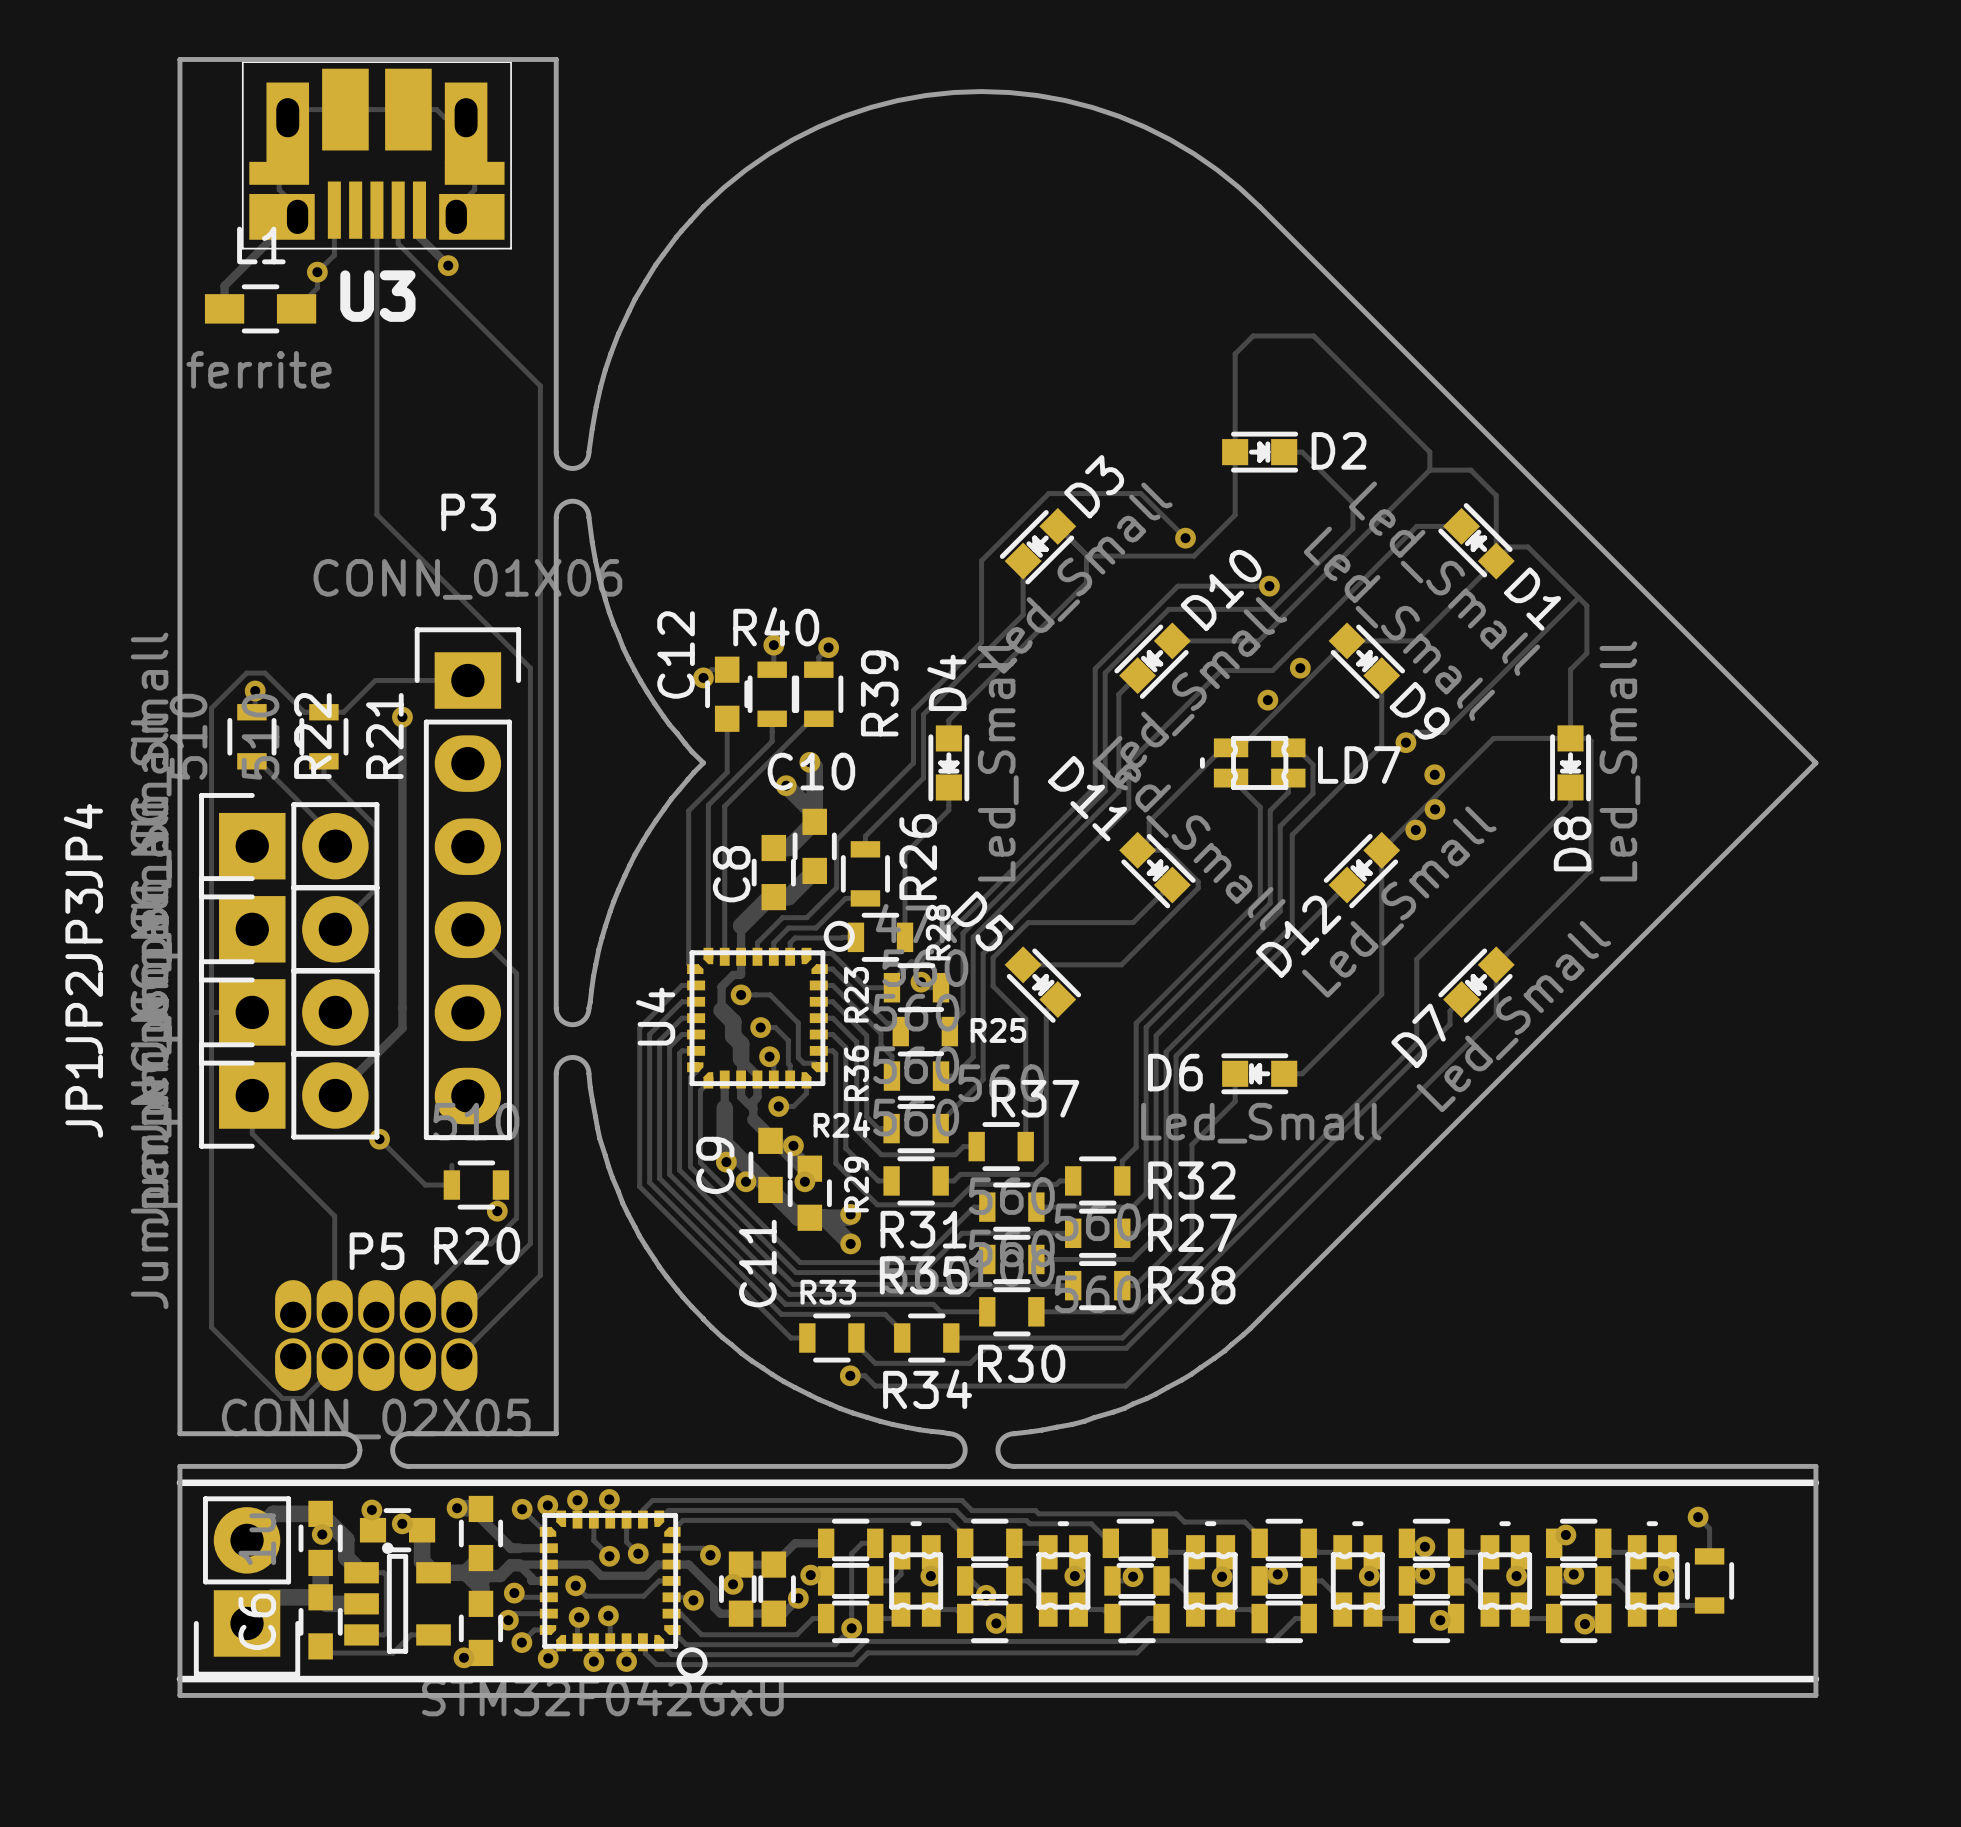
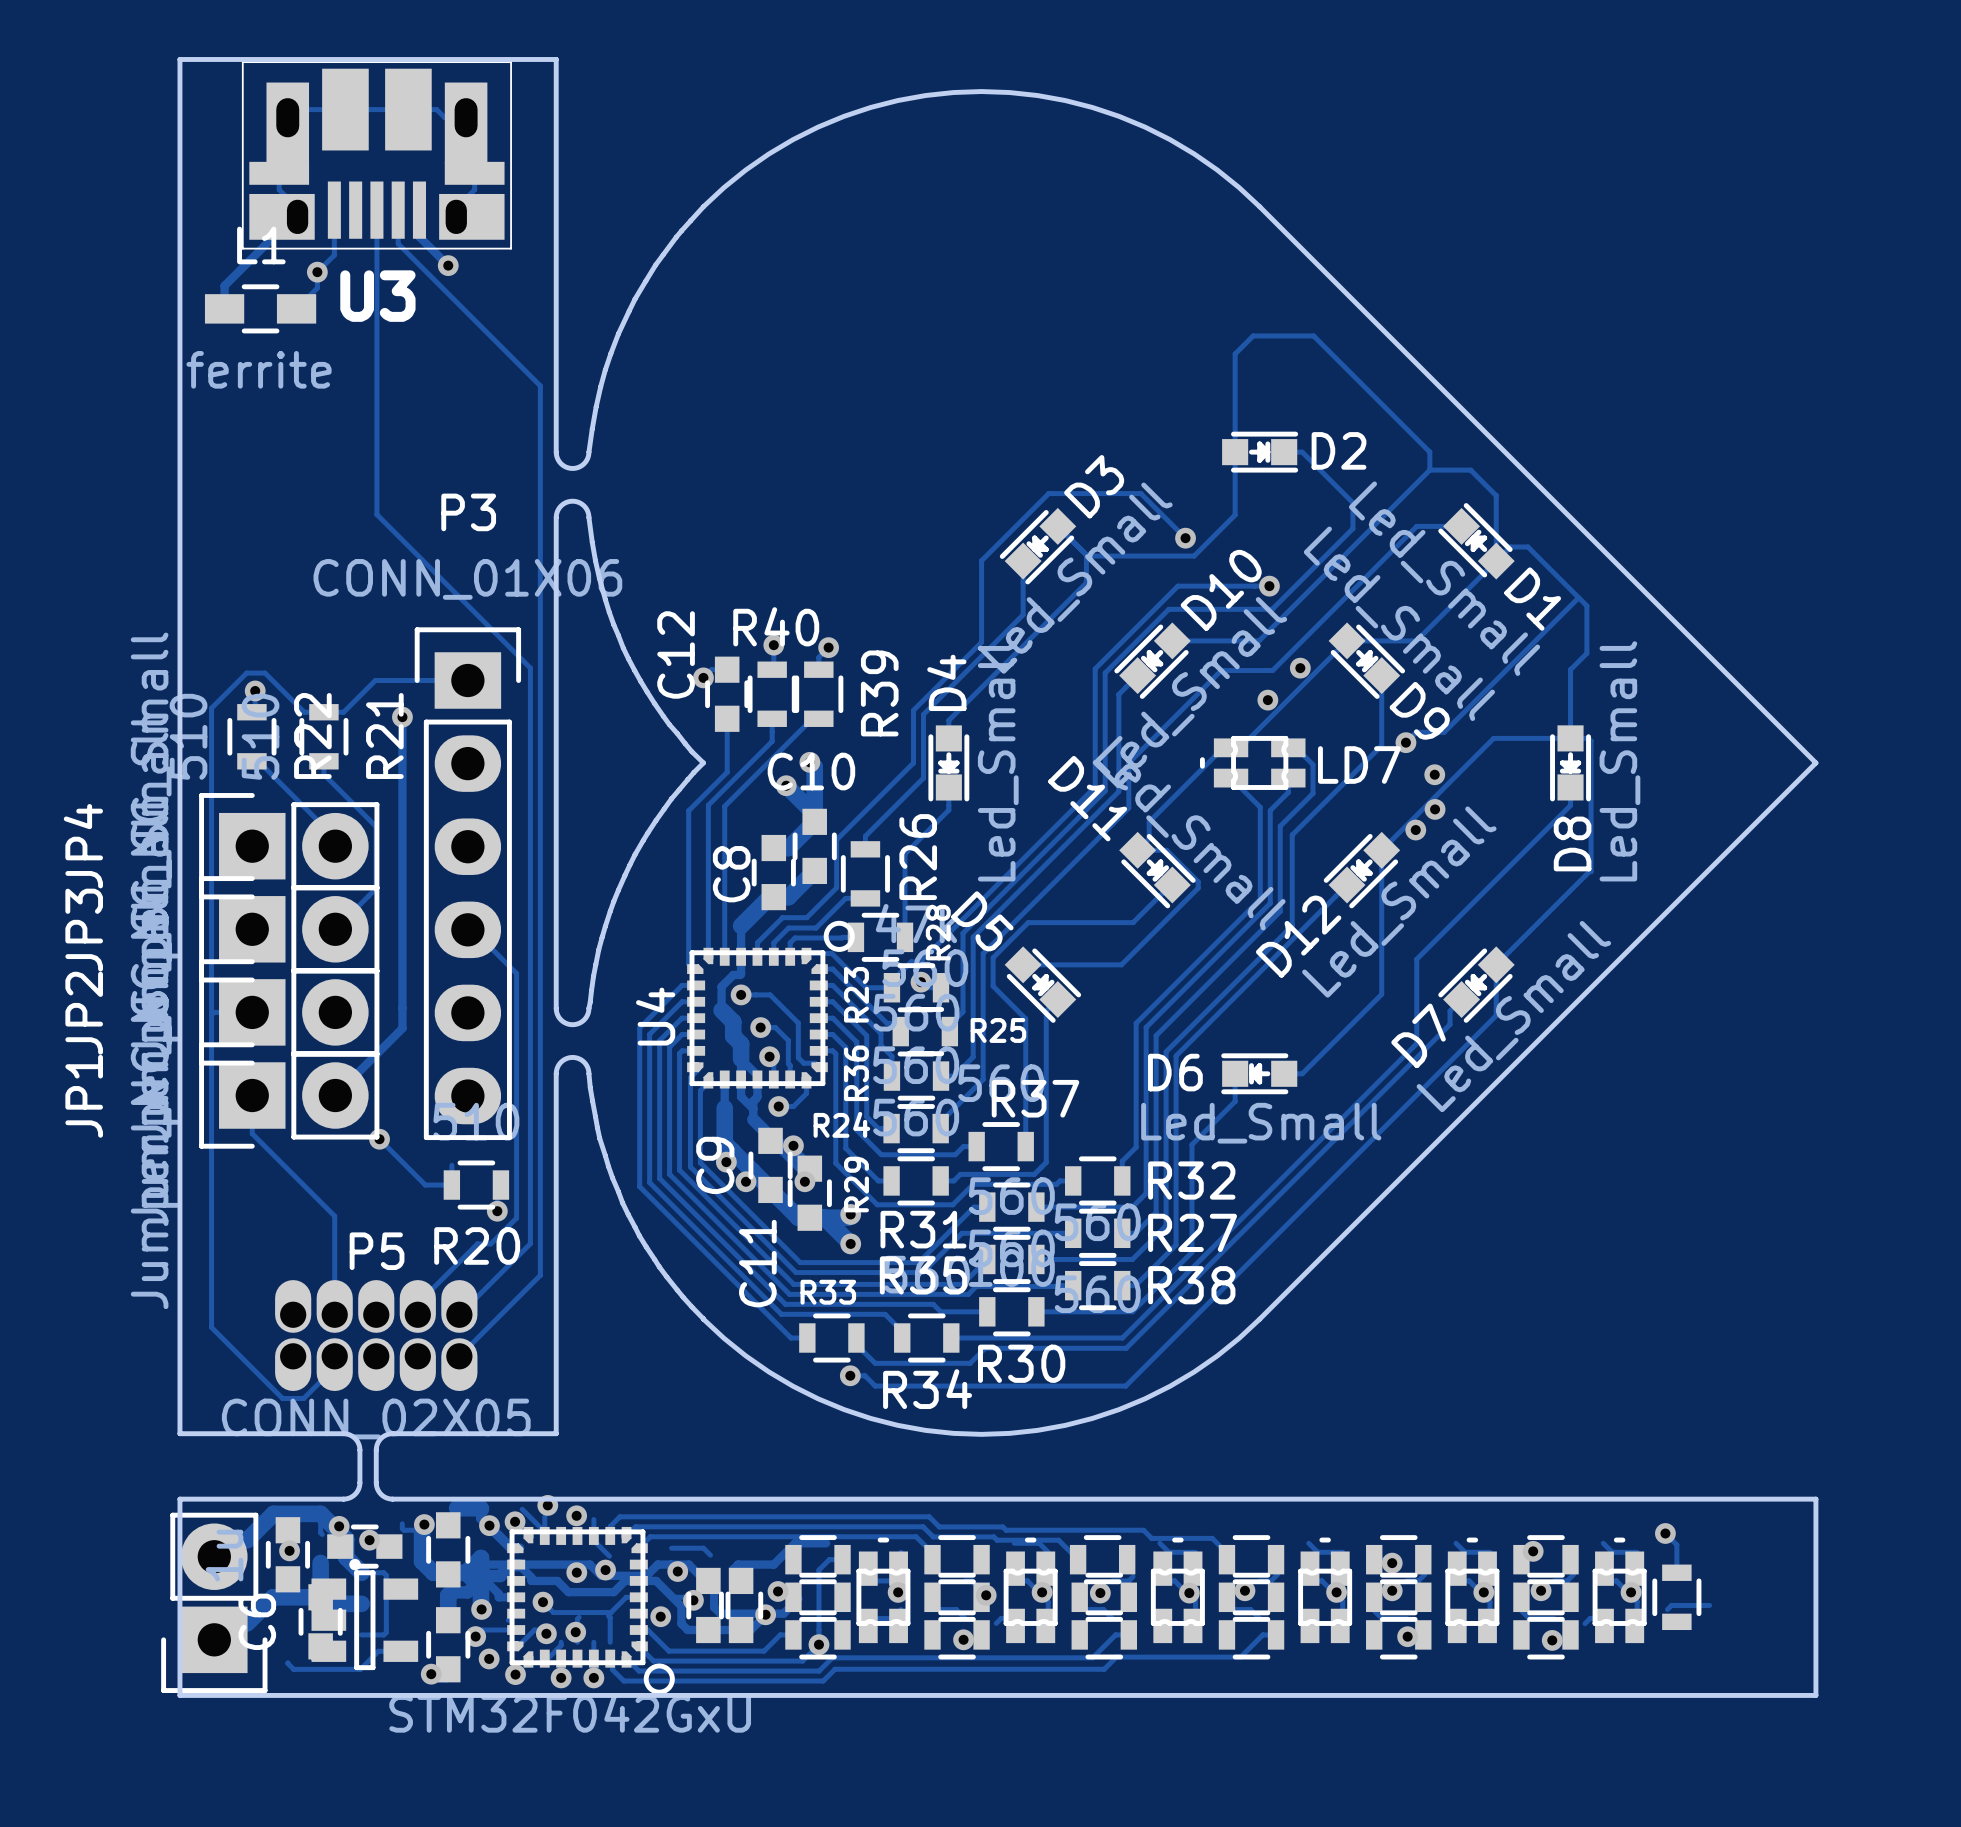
board edge: (703, 1319) (741, 1353) (783, 1381) (819, 1399) (852, 1413) (892, 1424) (955, 1434) (963, 1443) (965, 1450) (963, 1458) (957, 1464) (948, 1466) (408, 1466) (397, 1461) (392, 1450) (397, 1438) (408, 1433) -> (703, 1319) (724, 1338) (768, 1371) (818, 1398) (870, 1418) (897, 1425) (925, 1430) (981, 1434) (1037, 1430) (1065, 1425) (1092, 1418) (1144, 1398) (1194, 1371) (1239, 1338) (1259, 1319)
board edge: (1259, 1319) (1224, 1350) (1191, 1374) (1155, 1394) (1124, 1408) (1084, 1421) (1008, 1434) (999, 1443) (997, 1450) (1000, 1458) (1006, 1464) (1014, 1466) (1815, 1466) (1815, 1499) -> (408, 1433) (386, 1434) (381, 1438) (376, 1445) (376, 1487) (381, 1494) (388, 1498) (1815, 1499)
board edge: (359, 1450) (355, 1461) (345, 1466) (179, 1466) (179, 1499) -> (359, 1450) (359, 1487) (355, 1494) (347, 1498) (179, 1499)
line: (179, 1482) (1815, 1482) -> none
via: (609, 1499) -> none
via position: (577, 1500) -> (576, 1515)
via: (457, 1508) -> none
via position: (522, 1509) -> (515, 1521)
via: (371, 1510) -> none
track: none -> (544, 1516) (544, 1535)
track: (1698, 1517) (1709, 1528) (1709, 1556) -> (1665, 1533) (1676, 1544) (1676, 1572)
via: (1698, 1517) -> none
track: (626, 1519) (626, 1542) (638, 1553) -> none
track: (642, 1519) (642, 1510) (652, 1500) (961, 1500) (972, 1510) (1035, 1510) (1038, 1513) (1176, 1513) (1184, 1522) (1244, 1522) (1259, 1536) (1259, 1543) -> (610, 1535) (610, 1526) (619, 1516) (929, 1516) (939, 1526) (1002, 1526) (1006, 1530) (1143, 1530) (1151, 1538) (1212, 1538) (1226, 1553) (1226, 1559)
track: (659, 1519) (668, 1510) (955, 1510) (966, 1520) (1026, 1520) (1029, 1523) (1091, 1523) (1110, 1543) -> (626, 1535) (635, 1526) (923, 1526) (933, 1536) (993, 1536) (997, 1540) (1058, 1540) (1078, 1559)
via: (402, 1523) -> none
via: none -> (424, 1524)
via: none -> (489, 1525)
part: (397, 1530) -> none
track: (671, 1531) (683, 1520) (948, 1520) (965, 1536) (965, 1543) -> (638, 1548) (650, 1536) (916, 1536) (932, 1553) (932, 1559)
part: (480, 1533) -> none
via: none -> (1665, 1533)
via position: (322, 1534) -> (339, 1526)
via: (1565, 1535) -> none
part position: (320, 1538) -> (287, 1554)
via: none -> (369, 1540)
part: (850, 1543) -> none
track: (875, 1543) (862, 1543) (851, 1553) (851, 1628) (835, 1644) (686, 1644) (671, 1630) -> (842, 1559) (829, 1559) (818, 1570) (818, 1644) (802, 1661) (653, 1661) (638, 1646)
part: (989, 1543) -> none
part: (1135, 1543) -> none
part: (1284, 1543) -> none
part: (1431, 1543) -> none
part: (1578, 1543) -> none
part: none -> (364, 1546)
via: (1424, 1546) -> none
track: (521, 1548) (548, 1548) -> (489, 1564) (516, 1564)
part: none -> (448, 1549)
via: none -> (289, 1550)
via: none -> (1533, 1551)
via: (638, 1553) -> none
via: (710, 1555) -> none
via position: (609, 1556) -> (605, 1570)
part: none -> (817, 1559)
part: none -> (957, 1559)
part: none -> (1102, 1559)
part: none -> (1251, 1559)
part: none -> (1398, 1559)
part: none -> (1545, 1559)
via: none -> (1392, 1563)
via: none -> (677, 1571)
part position: (916, 1573) -> (883, 1590)
part position: (1063, 1573) -> (1030, 1590)
part position: (1210, 1573) -> (1177, 1590)
part position: (1357, 1573) -> (1325, 1590)
part position: (1505, 1573) -> (1472, 1590)
part position: (1652, 1573) -> (1619, 1590)
via: (1277, 1574) -> none
via: (1424, 1574) -> none
via: (1573, 1574) -> none
via: (810, 1575) -> none
via: (930, 1576) -> none
via: (1074, 1576) -> none
via: (1133, 1576) -> none
via: (1222, 1576) -> none
via: (1369, 1576) -> none
via: (1516, 1576) -> none
via: (1663, 1576) -> none
track: none -> (548, 1580) (557, 1580) (568, 1592) (613, 1592) (625, 1580) (656, 1580) (681, 1606) (681, 1623) (687, 1630) (750, 1630) (765, 1615)
track: (671, 1580) (658, 1580) (643, 1596) (586, 1596) (575, 1585) -> (638, 1597) (626, 1597) (611, 1612) (553, 1612) (543, 1602)
part: (850, 1580) -> none
part: (989, 1580) -> none
part: (1137, 1580) -> none
part: (1284, 1580) -> none
part: (1431, 1580) -> none
part: (1578, 1580) -> none
part position: (1709, 1580) -> (1676, 1597)
via: (733, 1584) -> none
via position: (575, 1585) -> (576, 1572)
part position: (247, 1586) -> (214, 1602)
part position: (741, 1589) -> (741, 1605)
part position: (773, 1589) -> (708, 1605)
via: none -> (1244, 1590)
via: none -> (1392, 1590)
via: none -> (1541, 1590)
via: none -> (898, 1592)
via: none -> (1042, 1592)
via: none -> (1336, 1592)
via: none -> (1483, 1592)
via: none -> (1631, 1592)
track: (514, 1593) (518, 1597) (548, 1597) -> none
via: (514, 1593) -> none
via: none -> (1100, 1593)
via: none -> (1189, 1593)
part position: (623, 1594) -> (590, 1610)
track: none -> (516, 1597) (498, 1597) (498, 1593) (486, 1581) (478, 1581) (467, 1592) (451, 1592) (448, 1595) (448, 1620)
part: none -> (817, 1597)
part: none -> (957, 1597)
part: none -> (1104, 1597)
part: none -> (1251, 1597)
part: none -> (1398, 1597)
part: none -> (1545, 1597)
part position: (397, 1598) -> (364, 1614)
via position: (798, 1598) -> (778, 1591)
via: none -> (543, 1602)
via: none -> (481, 1609)
track: (516, 1613) (548, 1613) -> none
track: (671, 1613) (680, 1613) (701, 1634) (796, 1634) (813, 1618) (826, 1618) -> (638, 1630) (647, 1630) (668, 1651) (764, 1651) (780, 1634) (793, 1634)
via: none -> (765, 1614)
via: (608, 1615) -> none
via: none -> (660, 1616)
via position: (579, 1617) -> (575, 1632)
part: (850, 1618) -> none
part: (989, 1618) -> none
part: (1137, 1618) -> none
track: (1161, 1618) (1148, 1618) (1125, 1641) (865, 1641) (851, 1654) (671, 1654) (659, 1642) -> (1128, 1634) (1115, 1634) (1092, 1657) (832, 1657) (819, 1671) (638, 1671) (626, 1658)
part: (1284, 1618) -> none
track: (1308, 1618) (1295, 1618) (1273, 1640) (1149, 1640) (1137, 1652) (867, 1652) (856, 1664) (656, 1664) (645, 1653) (645, 1644) (642, 1642) -> (1276, 1634) (1262, 1634) (1240, 1657) (1116, 1657) (1104, 1669) (835, 1669) (823, 1681) (623, 1681) (612, 1669) (612, 1661) (610, 1658)
part: (1431, 1618) -> none
part: (1578, 1618) -> none
via: (508, 1620) -> none
via: (1440, 1620) -> none
via: (996, 1623) -> none
via: (1584, 1624) -> none
part position: (480, 1628) -> (448, 1644)
via: (851, 1628) -> none
track: none -> (516, 1630) (482, 1630) (475, 1636)
via: none -> (546, 1633)
track: (433, 1634) (411, 1634) (393, 1653) (326, 1653) (320, 1646) -> (400, 1651) (378, 1651) (360, 1669) (293, 1669) (287, 1662)
part: none -> (817, 1634)
part: none -> (957, 1634)
part: none -> (1104, 1634)
part: none -> (1251, 1634)
part: none -> (1398, 1634)
part: none -> (1545, 1634)
via: none -> (475, 1636)
via: none -> (1407, 1636)
via: none -> (963, 1639)
via: none -> (1552, 1640)
via: (521, 1642) -> none
via: none -> (818, 1644)
via: (463, 1657) -> none
via: none -> (489, 1658)
via position: (548, 1658) -> (561, 1677)
via position: (593, 1661) -> (593, 1677)
via: (626, 1661) -> none
via: none -> (431, 1674)
via: none -> (515, 1674)
line: (179, 1679) (1815, 1679) -> none

